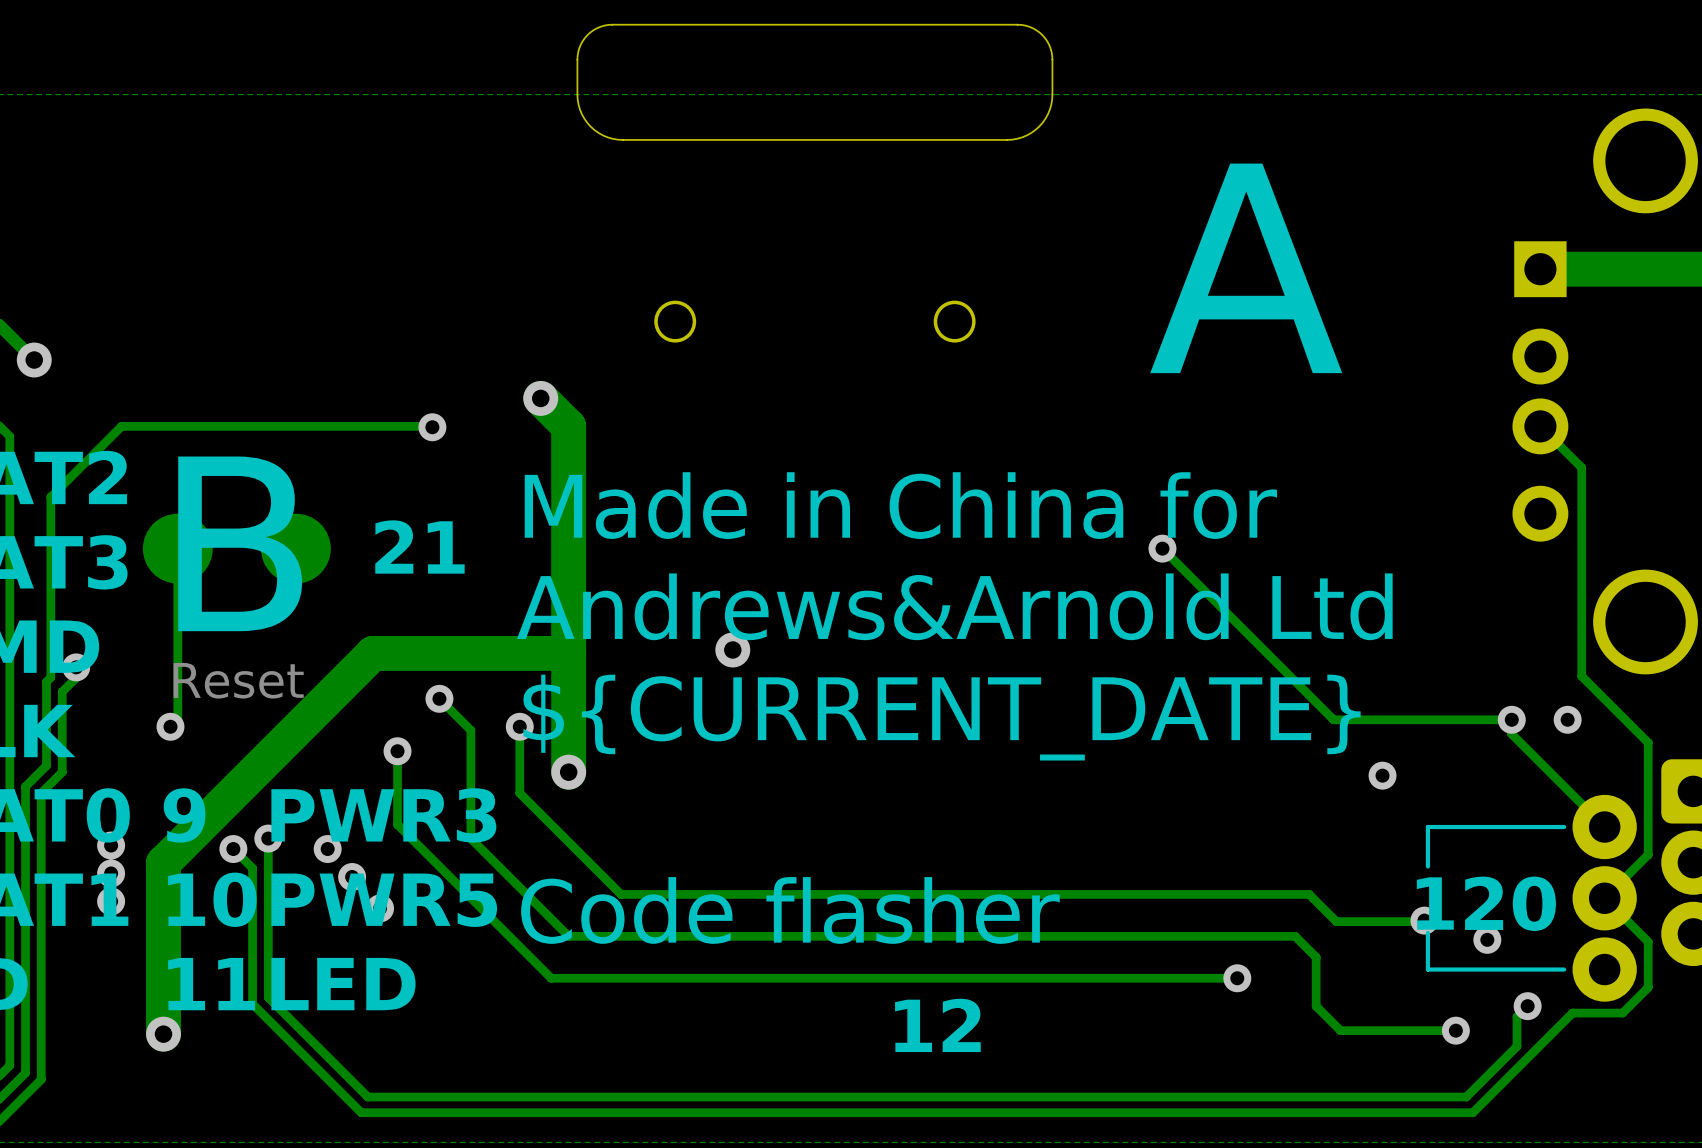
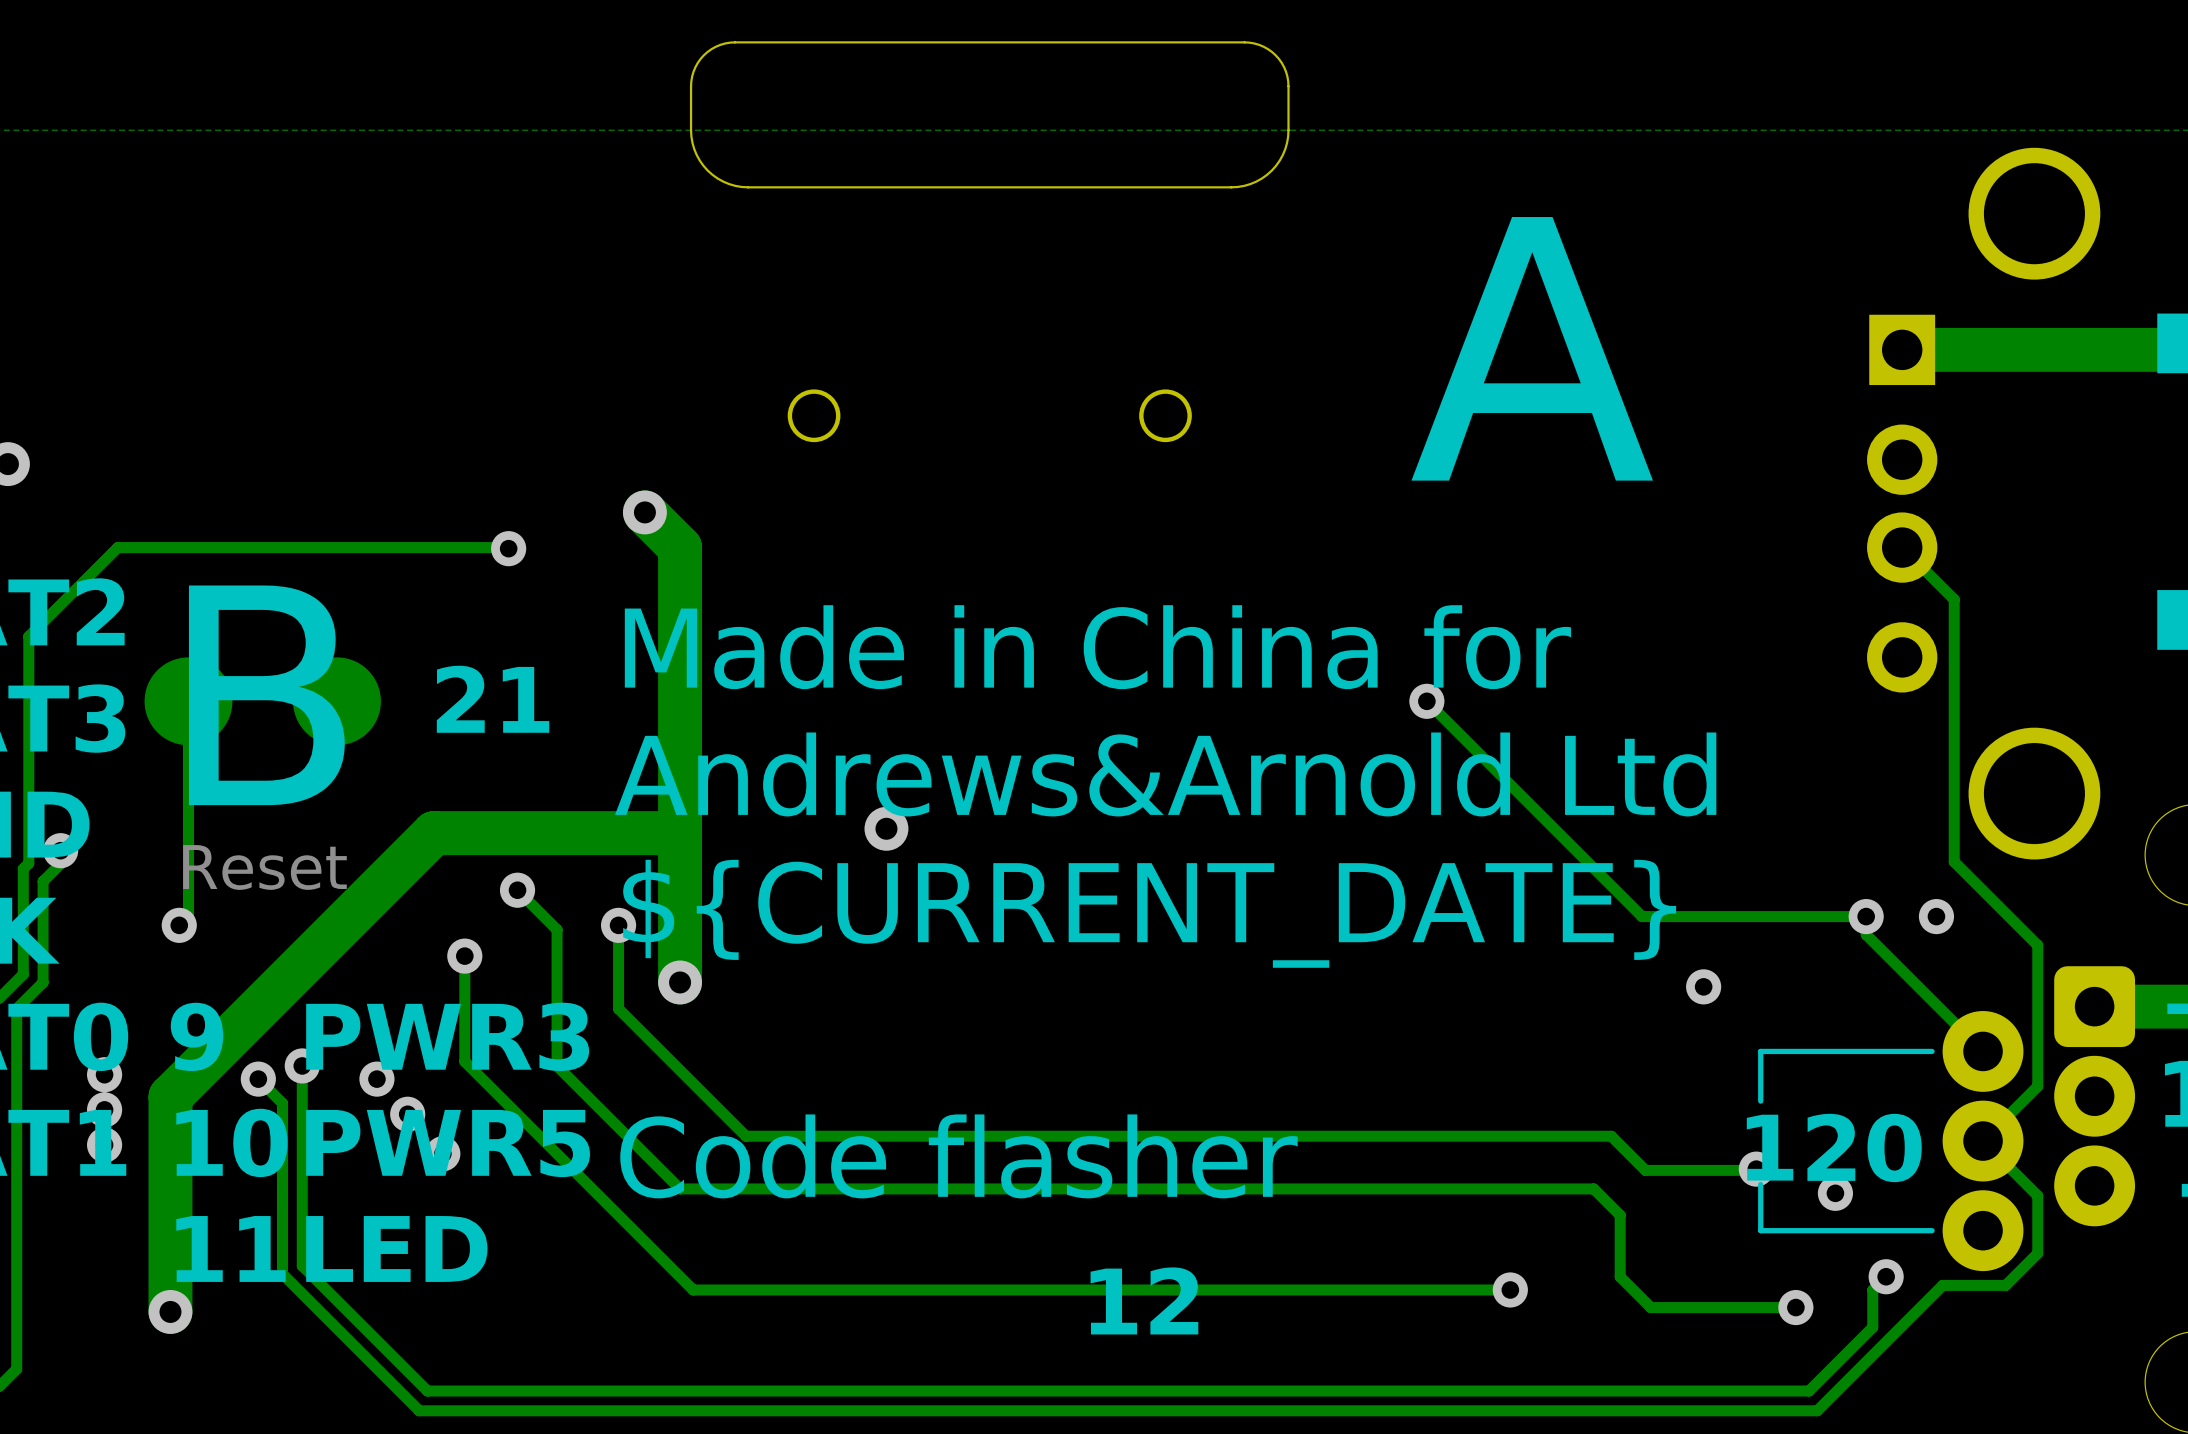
track: (397, 824) (551, 978) (1237, 978) -> (464, 1048) (464, 1061) (693, 1289) (1510, 1289)
via position: (1237, 978) -> (1510, 1289)

